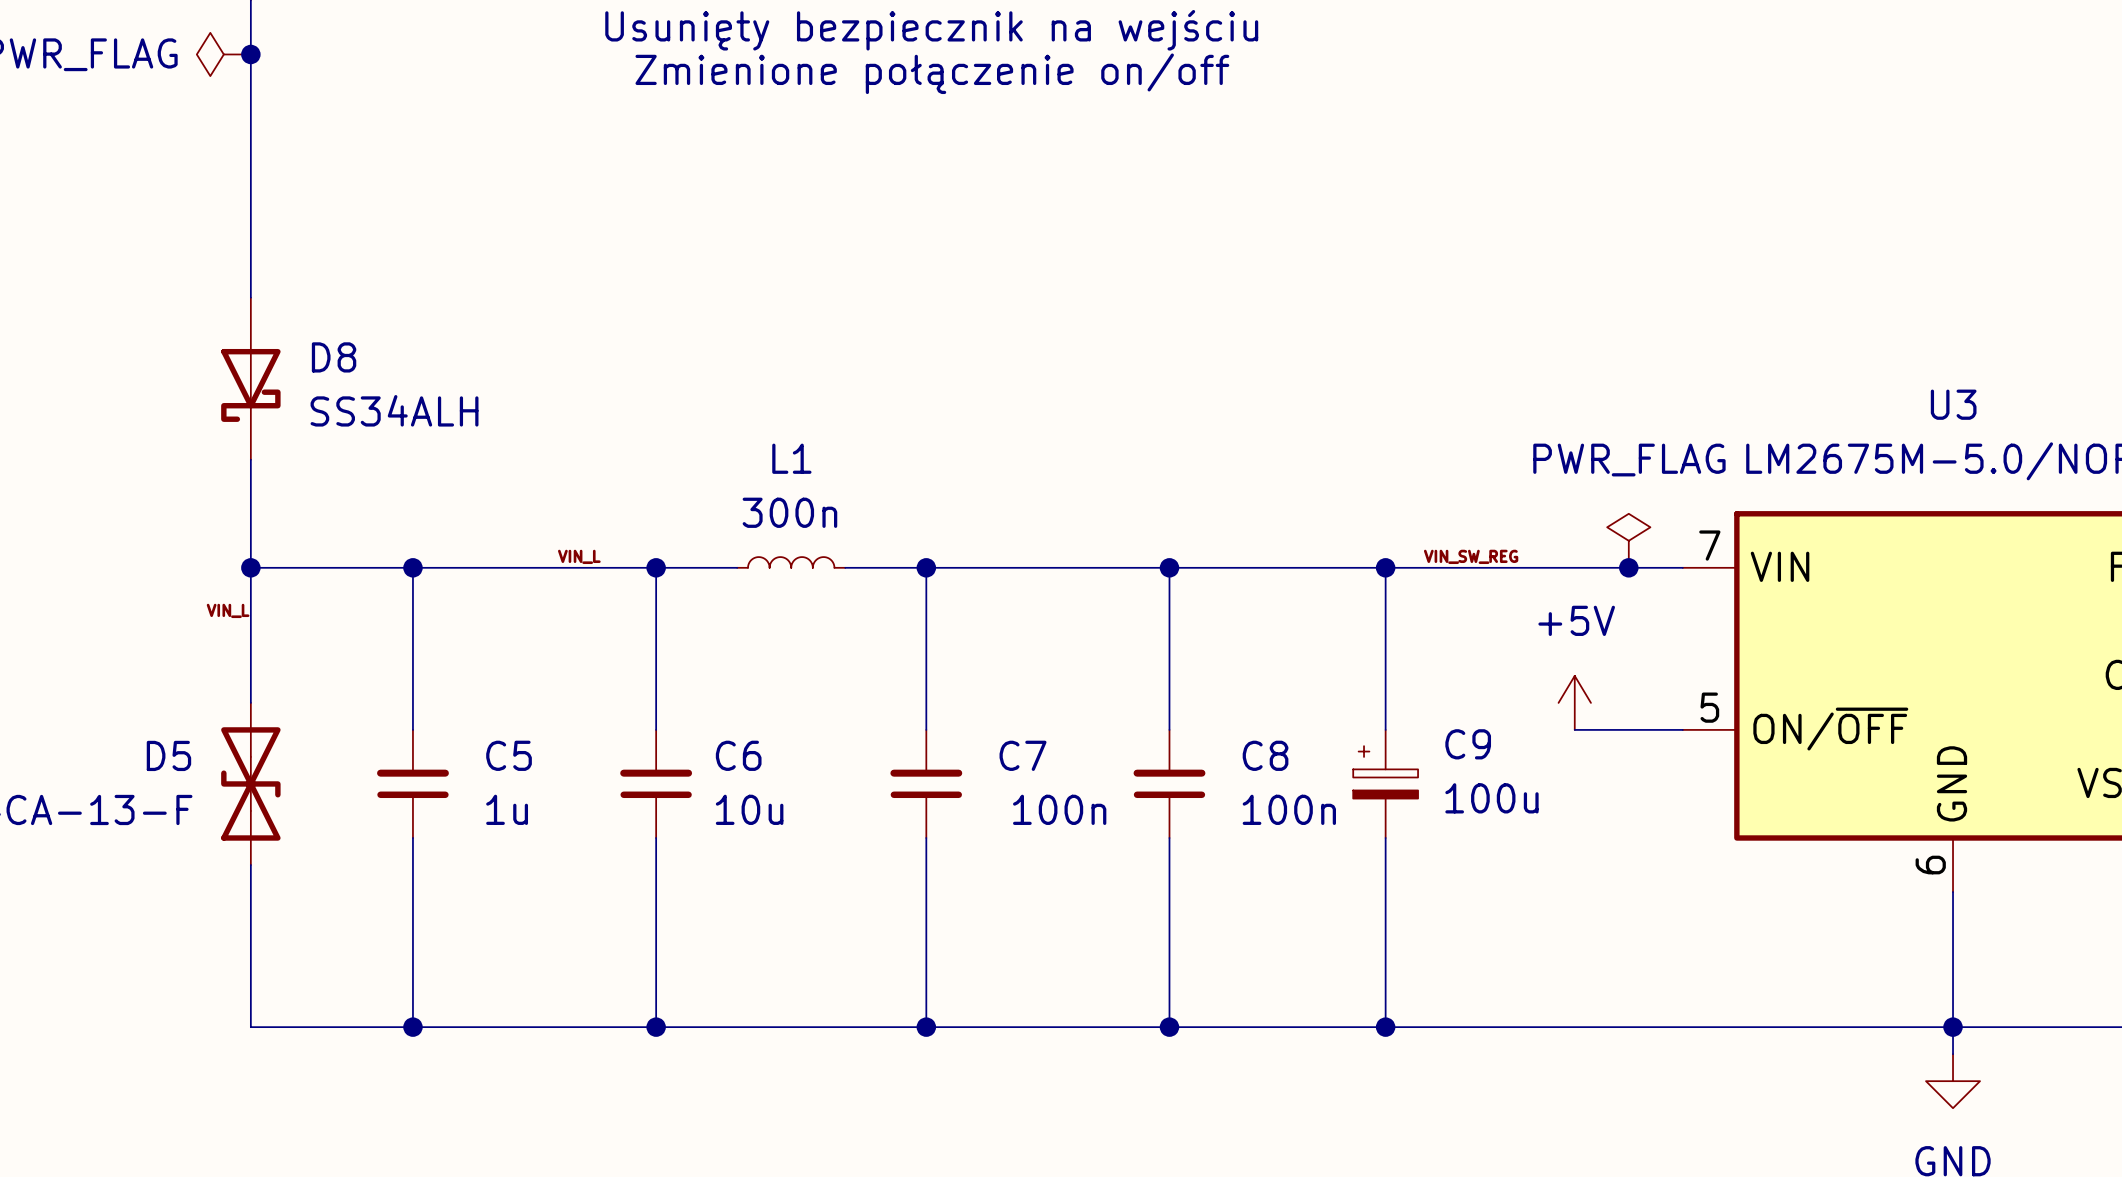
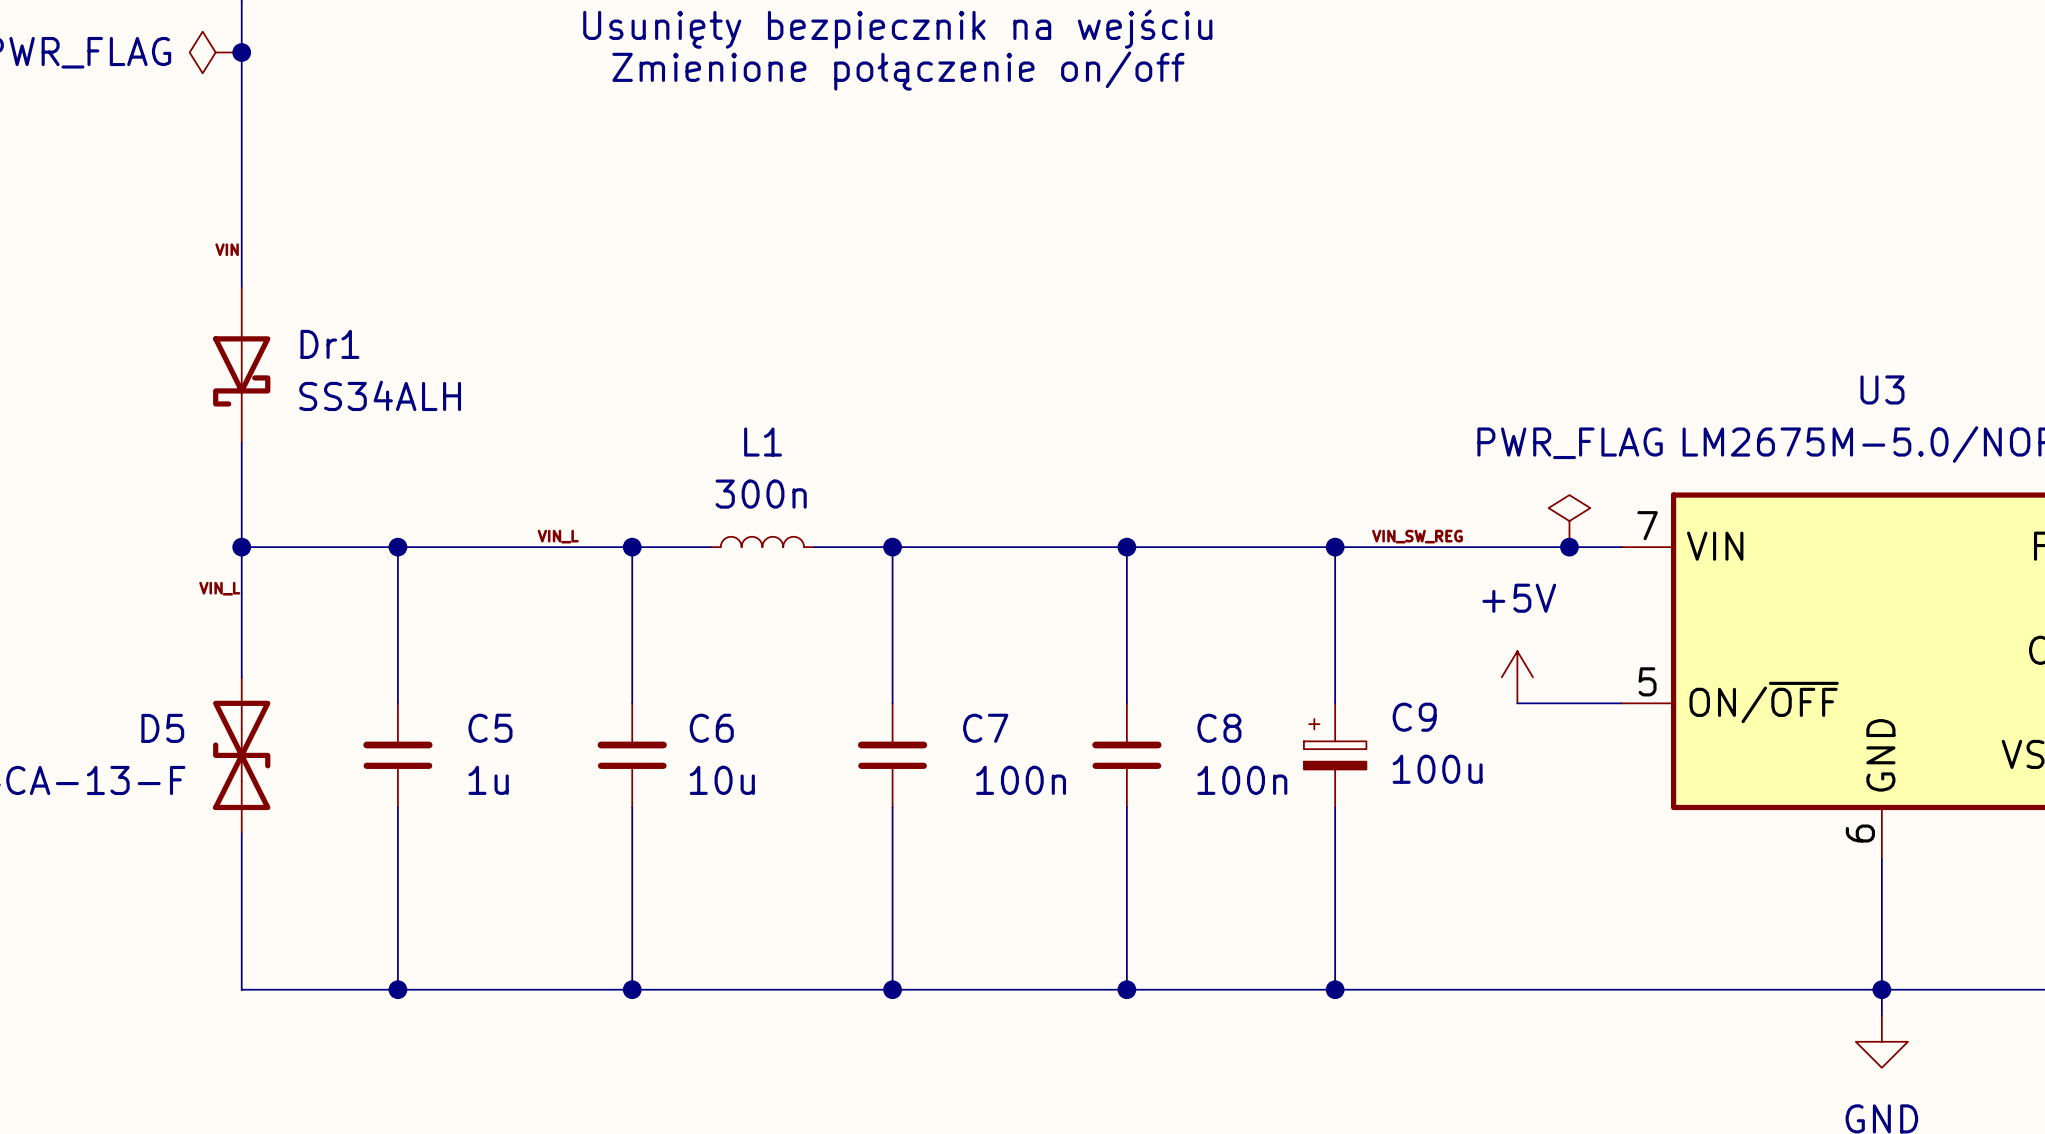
label: none -> VIN (227, 249)
D8 name: D8 (334, 357) -> Dr1 (329, 344)

